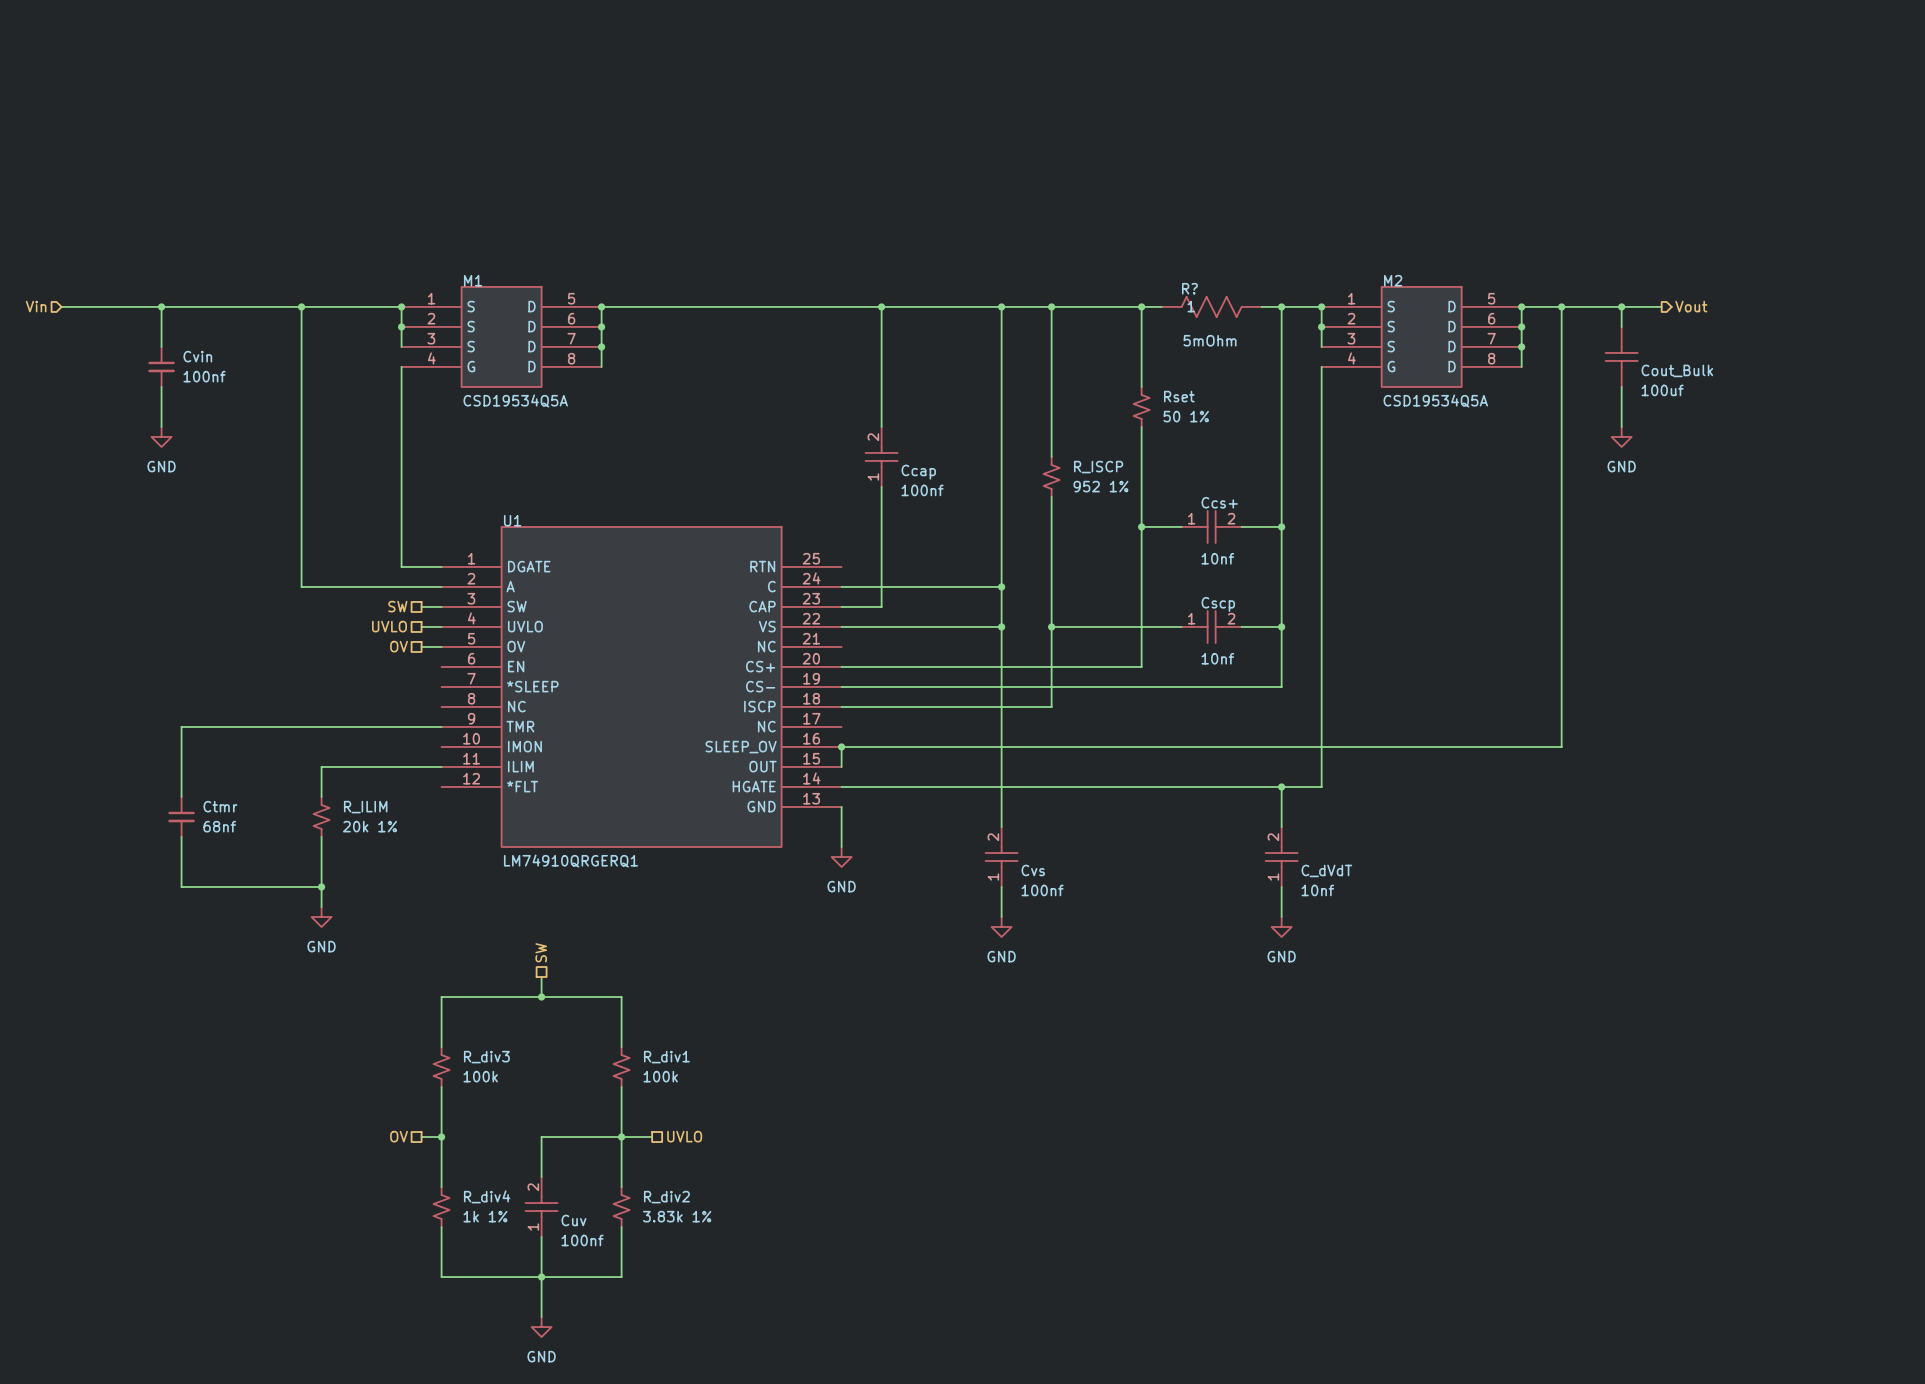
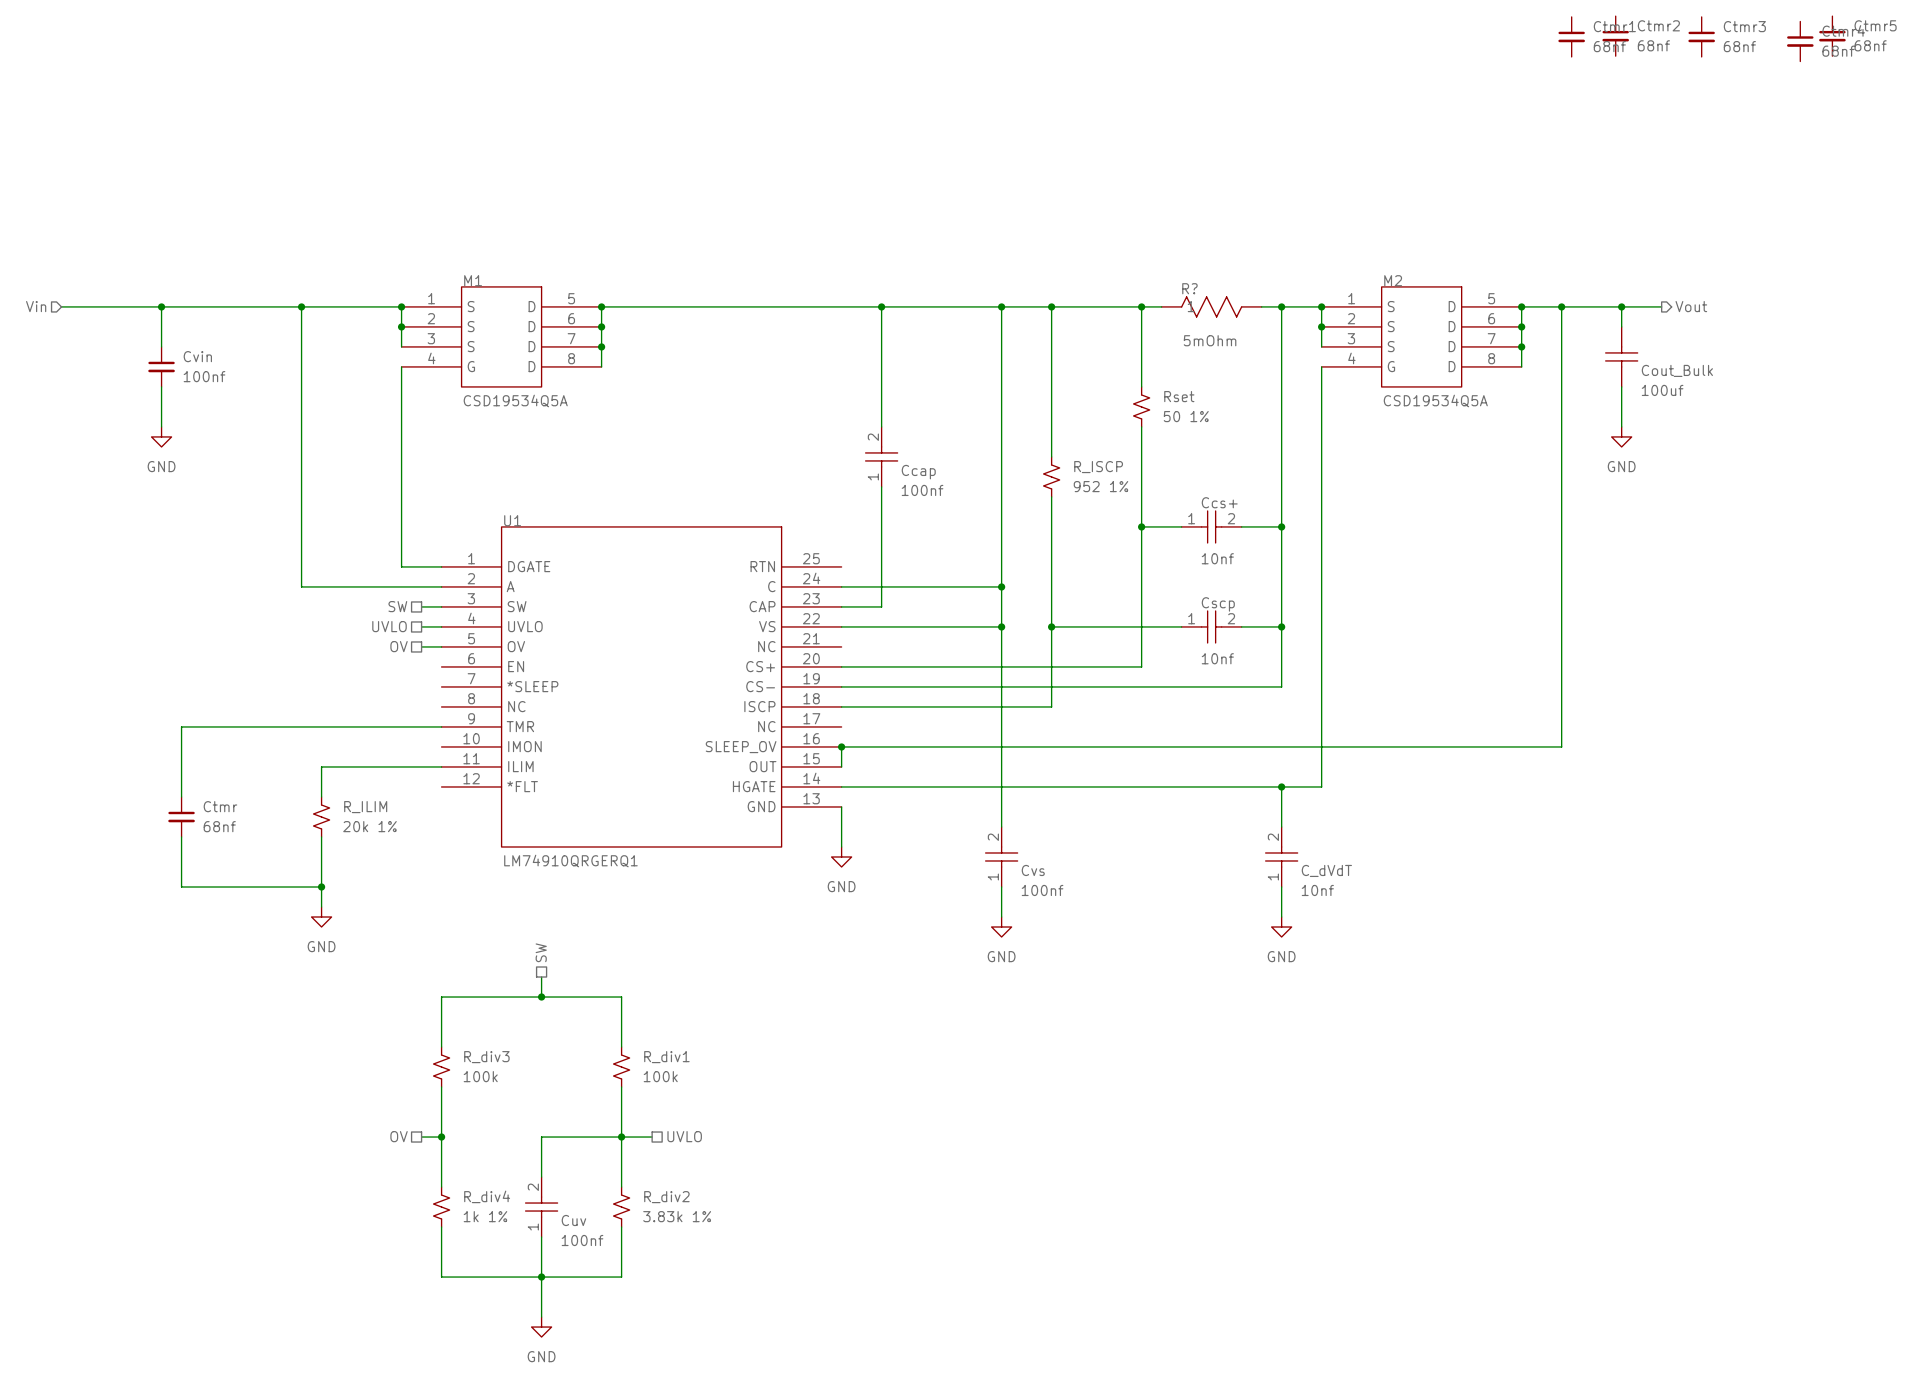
Ctmr1: none -> 68nf (1571, 36)
Ctmr2: none -> 68nf (1615, 36)
Ctmr3: none -> 68nf (1701, 36)
Ctmr5: none -> 68nf (1832, 36)
Ctmr4: none -> 68nf (1800, 41)

